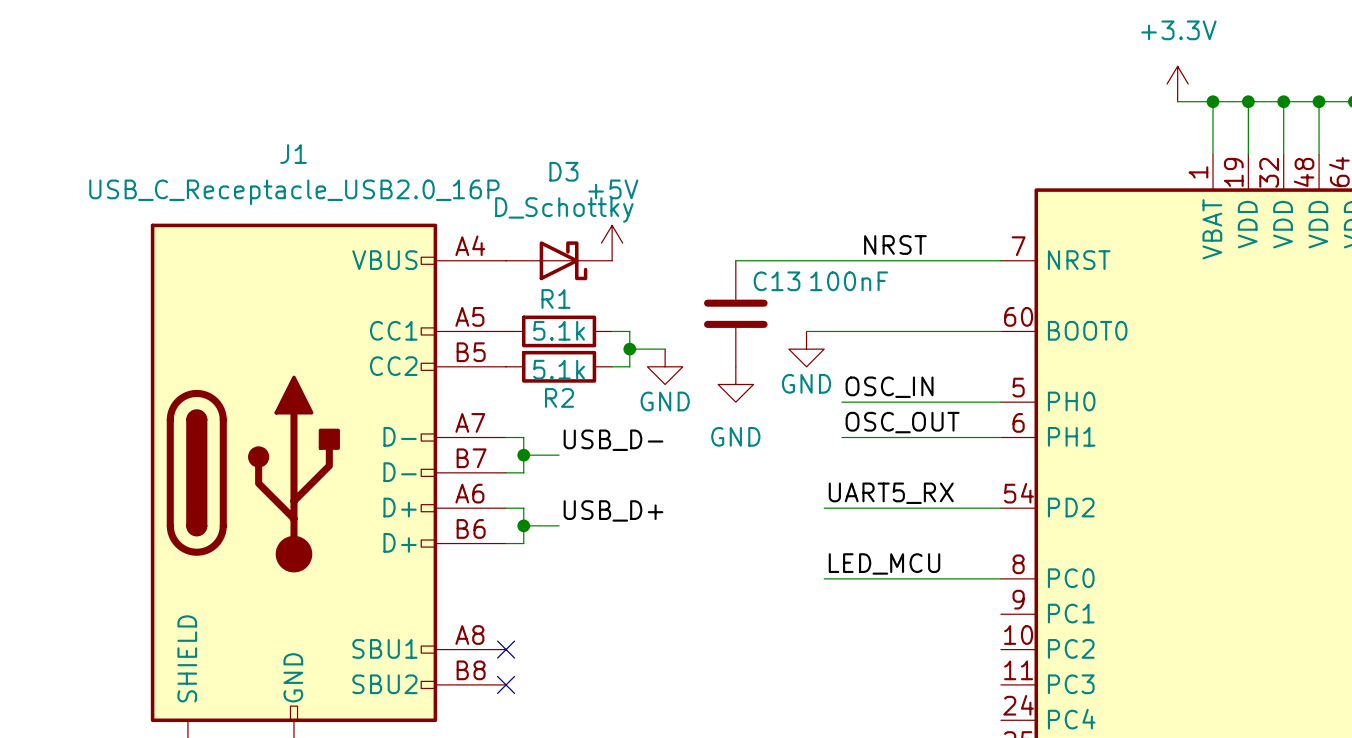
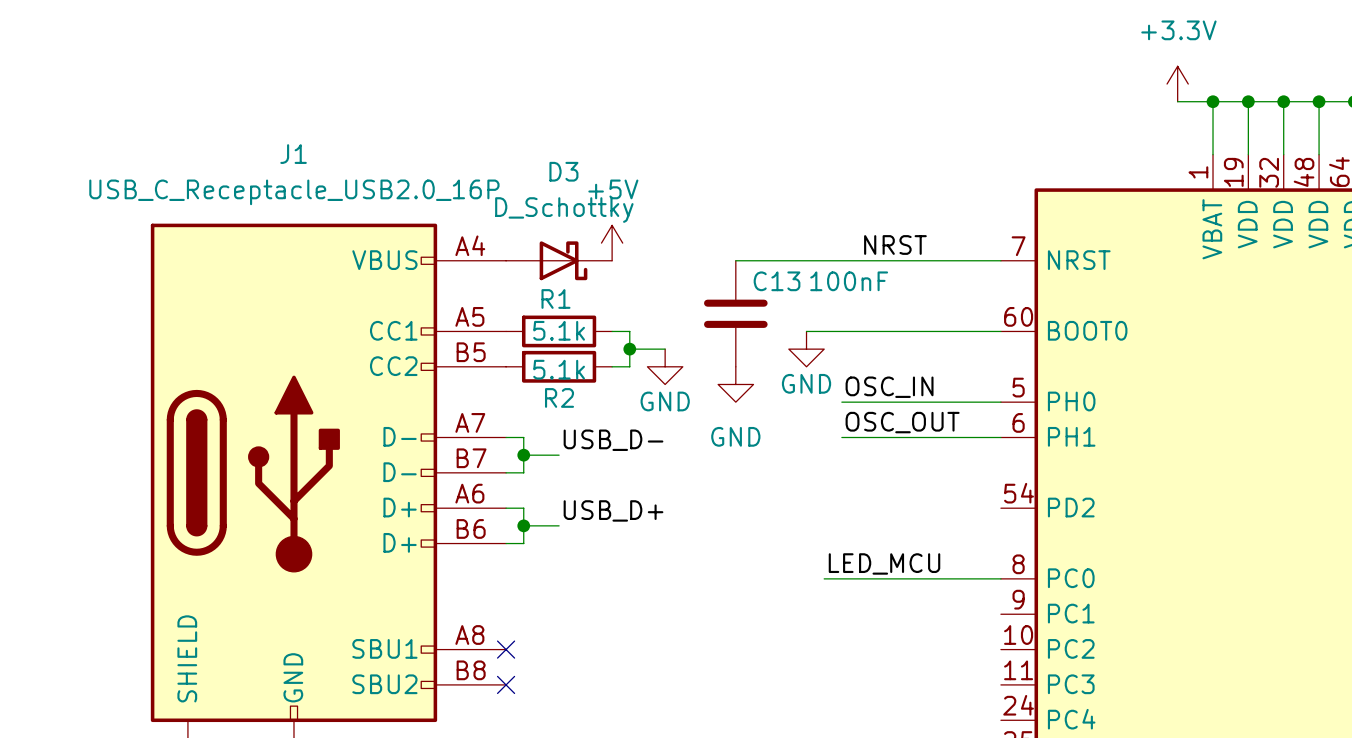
label: UART5_RX (891, 493) -> none
wire: (824, 508) (1000, 508) -> none

